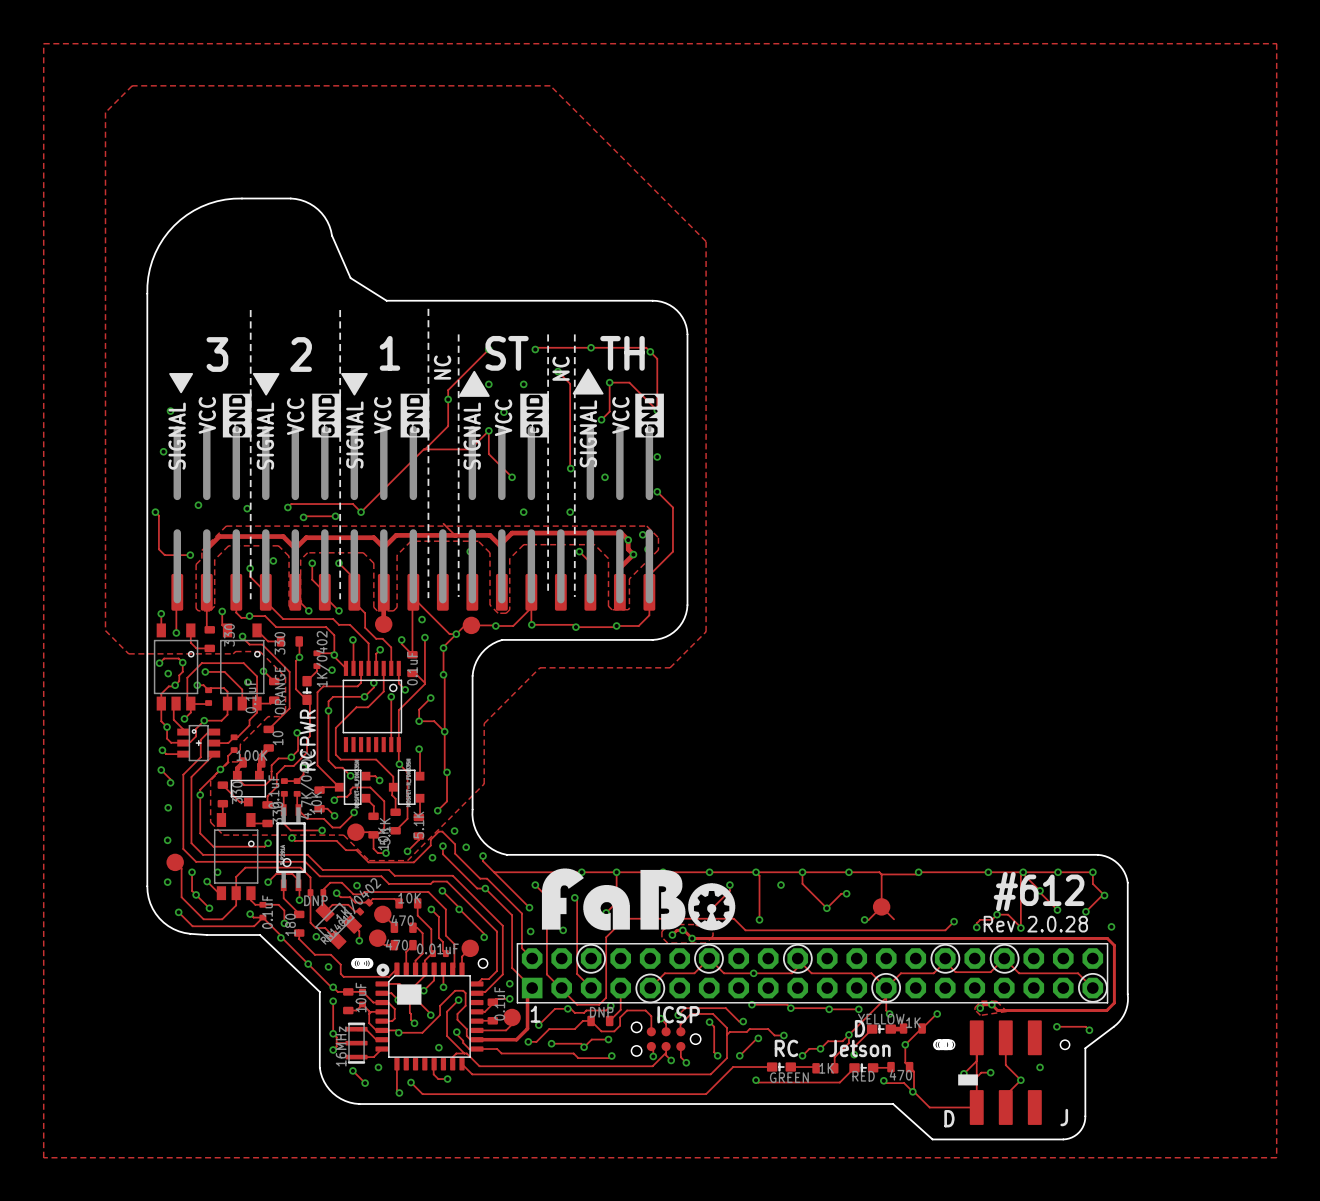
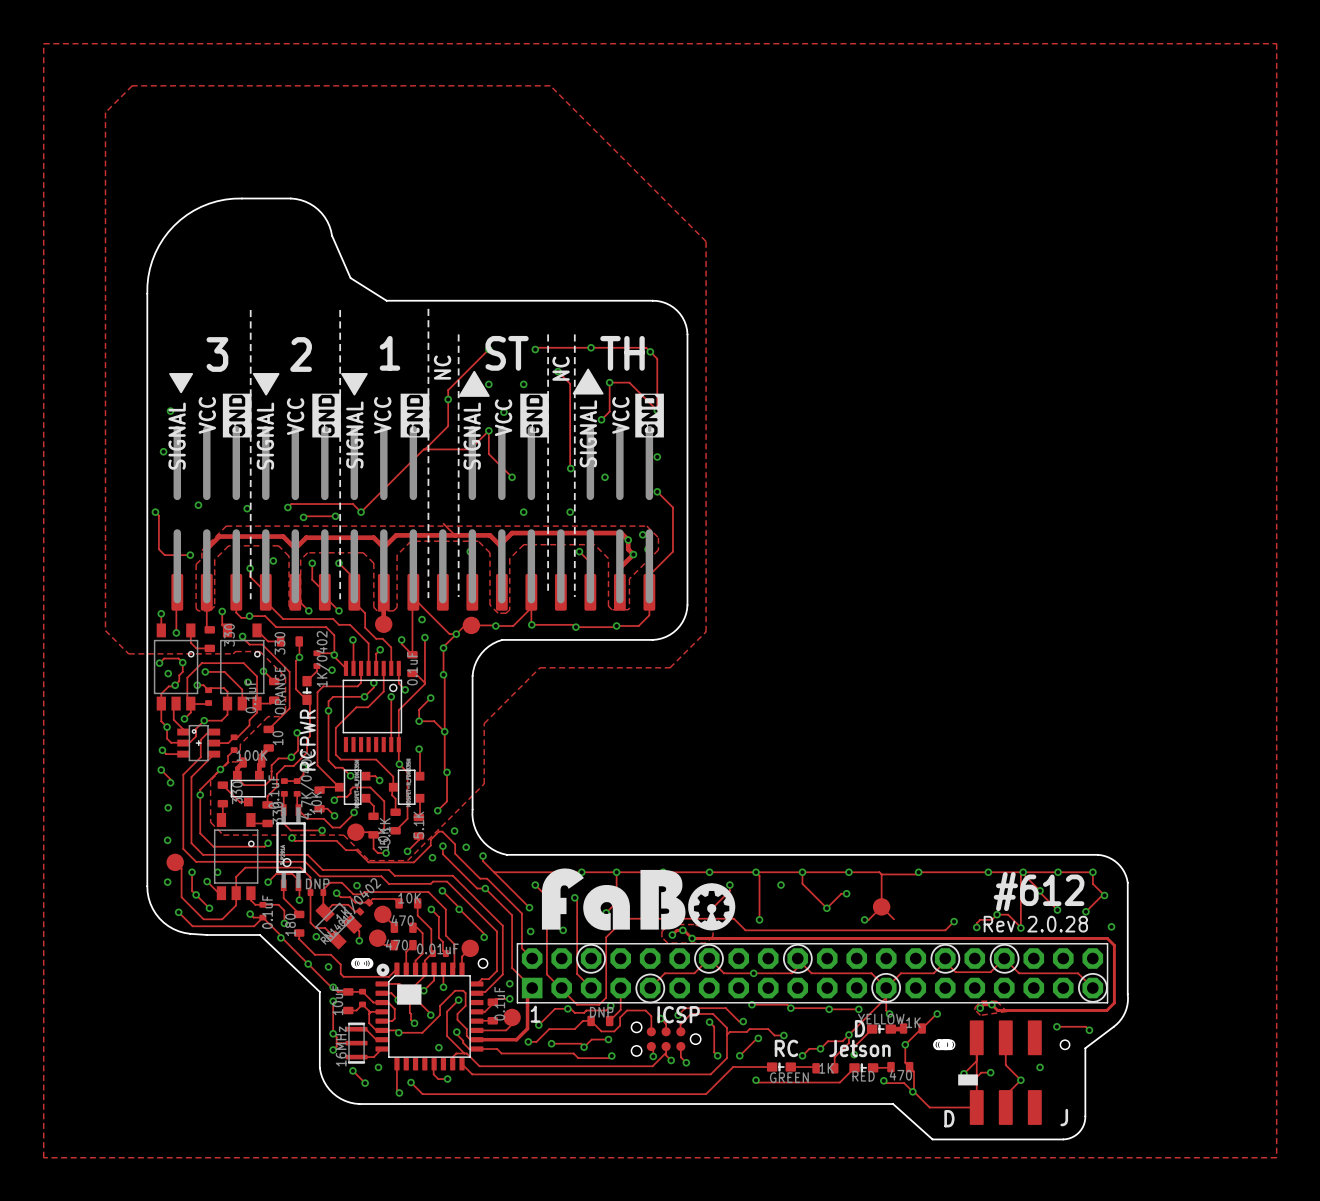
part value position: DNP (315, 900) -> DNP (317, 883)
part value position: 10uF (361, 997) -> 10uF (337, 1000)

